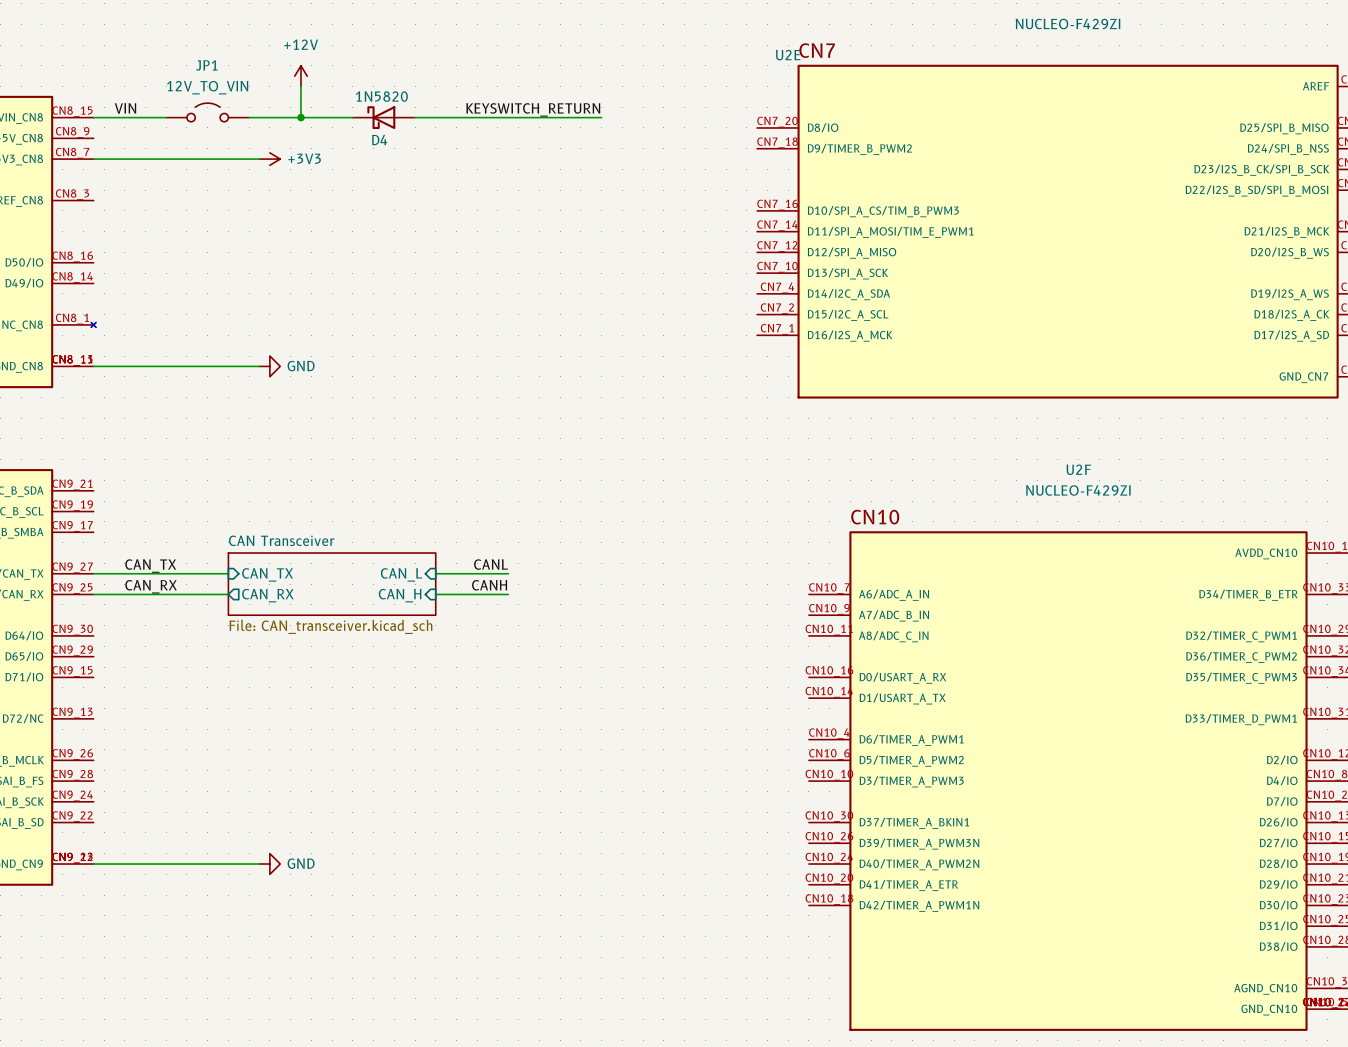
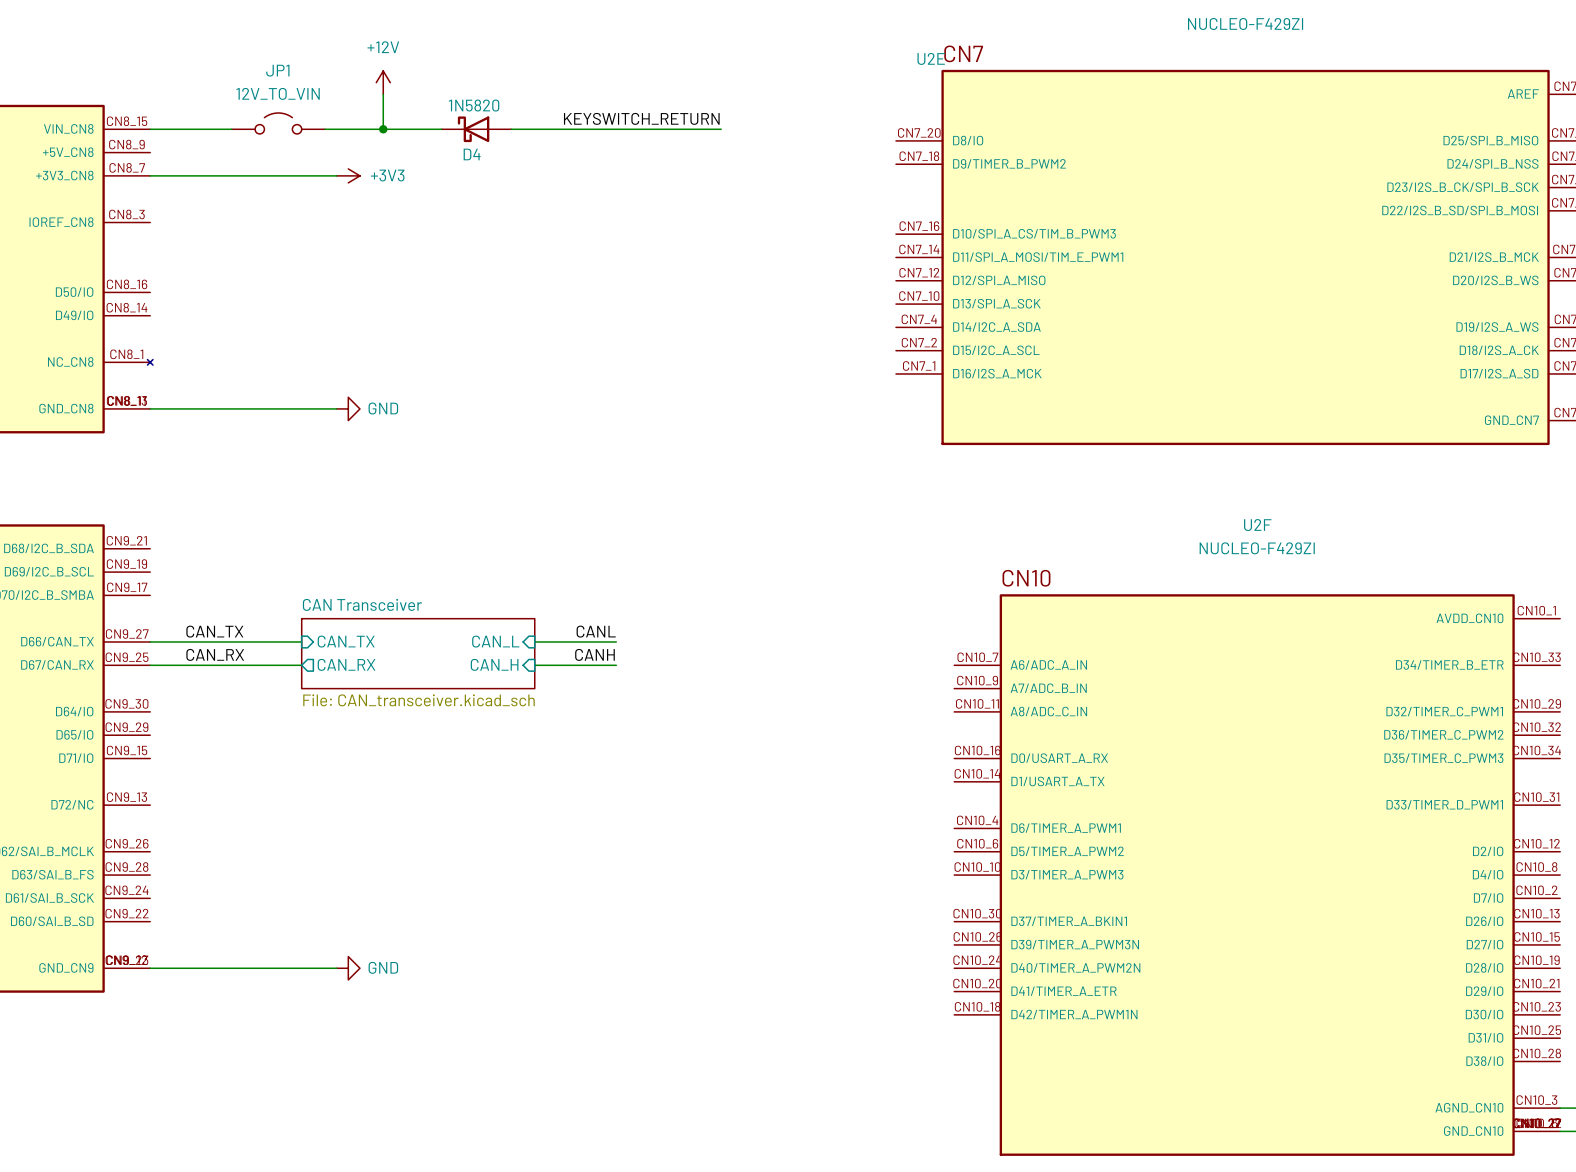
label: VIN (125, 108) -> none

